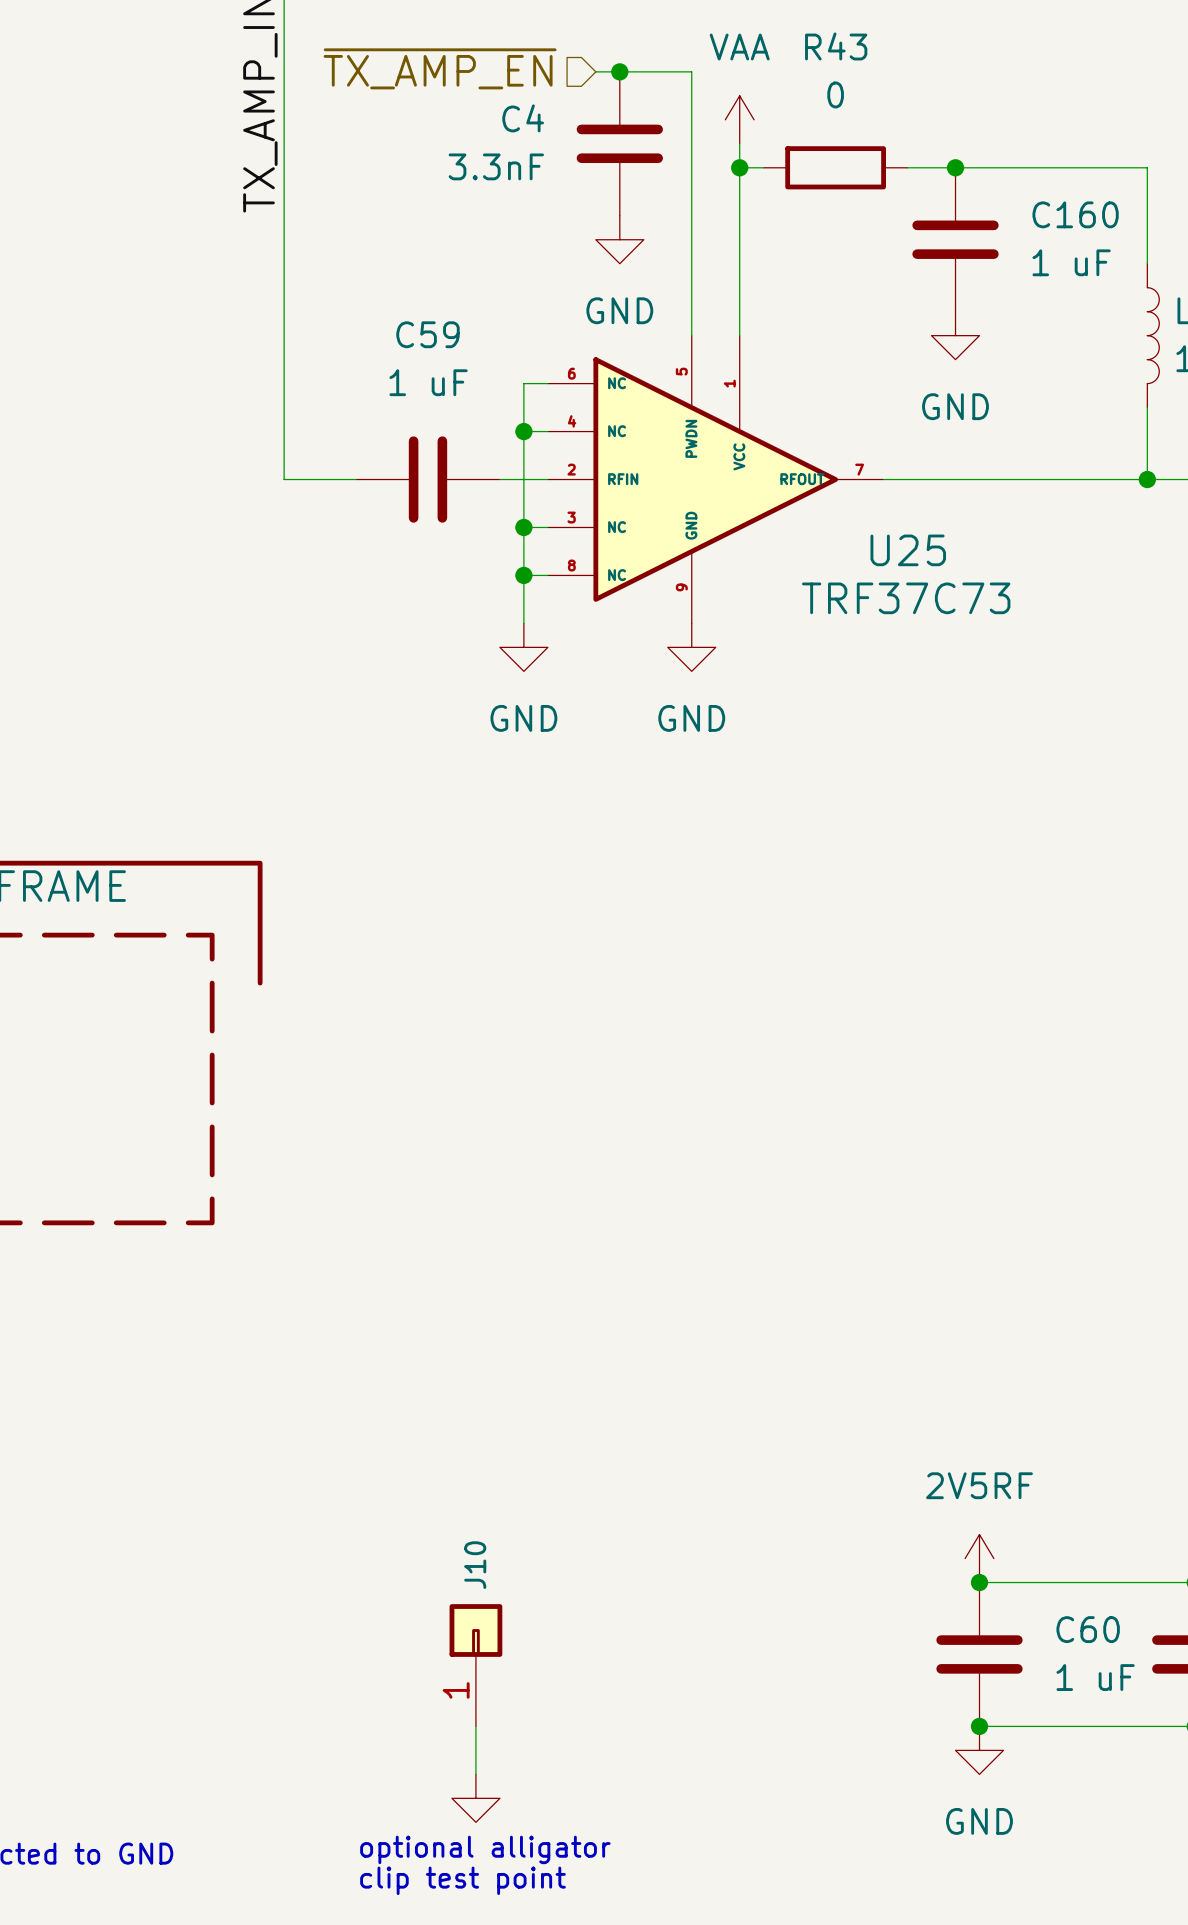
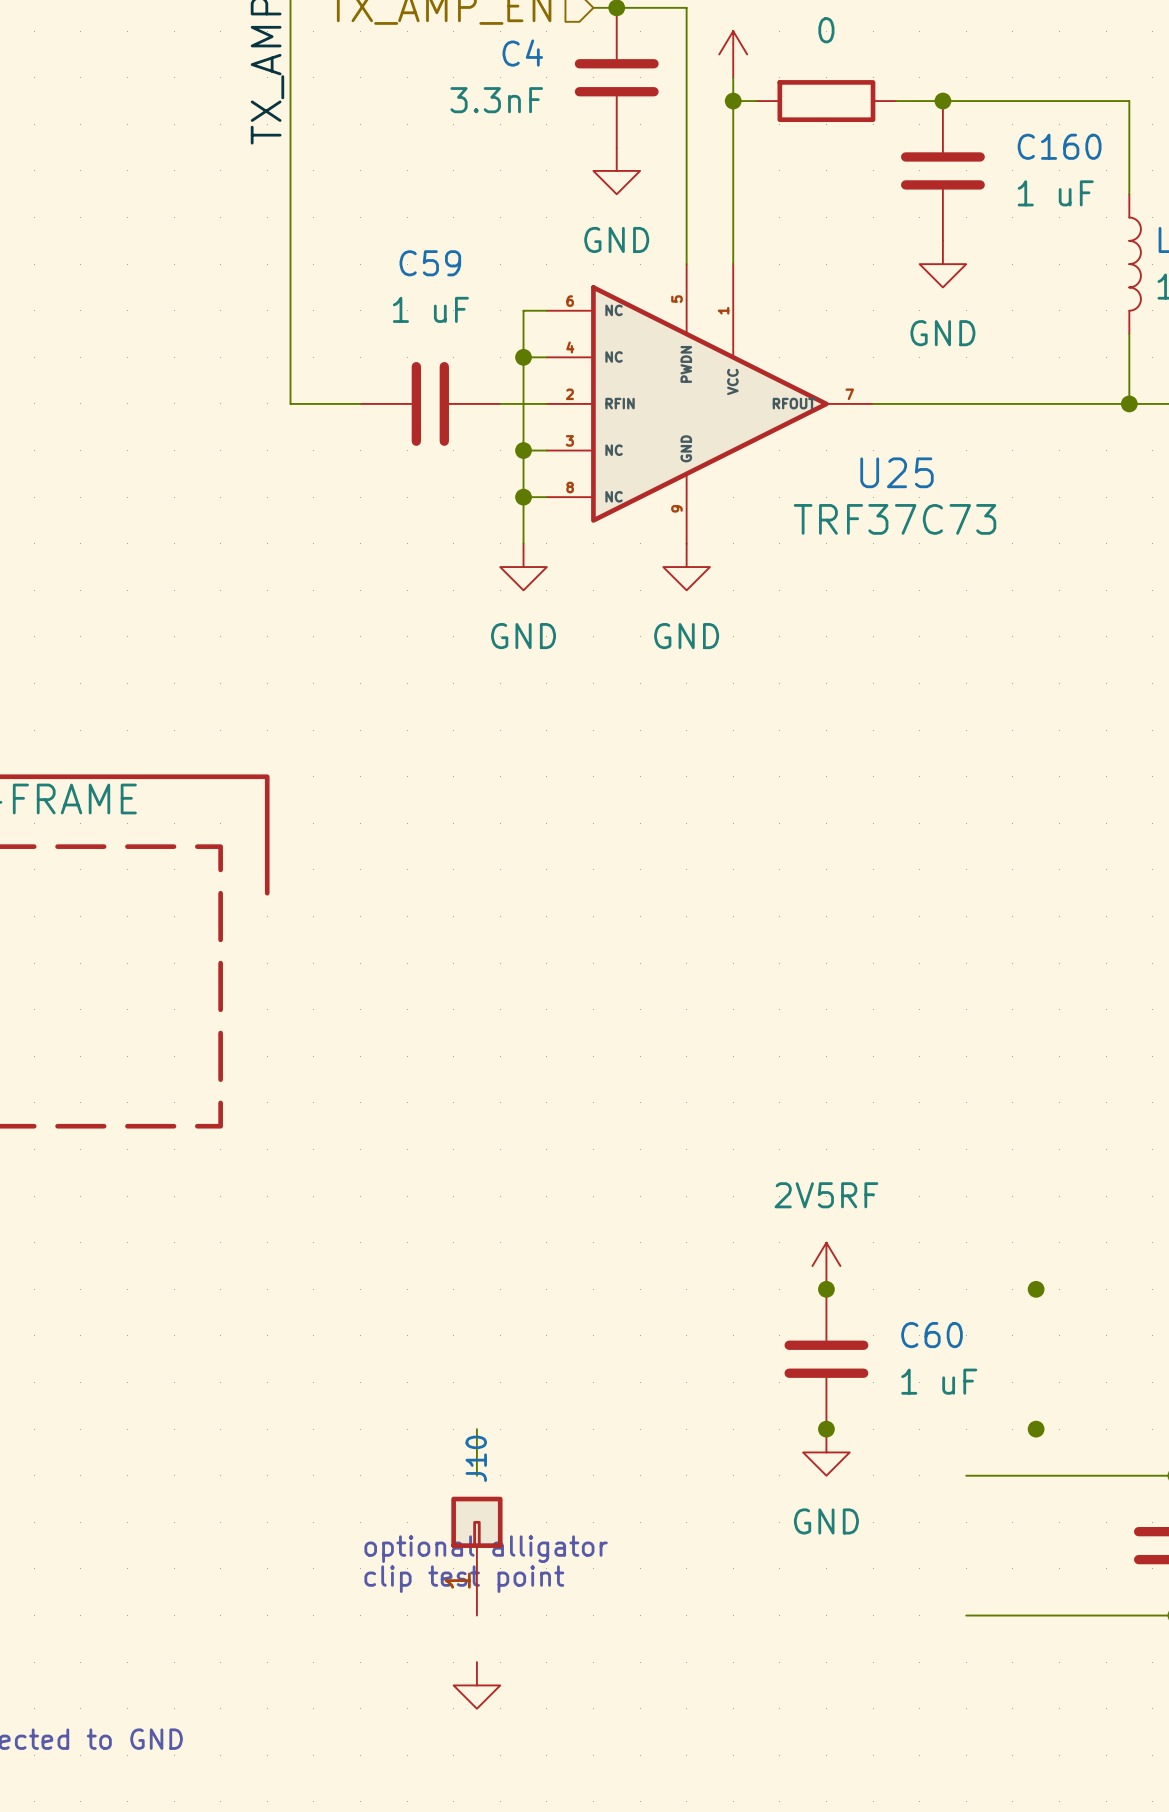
junction: none -> (826, 1289)
junction: none -> (1036, 1289)
junction: none -> (826, 1429)
junction: none -> (1036, 1429)
power symbol position: 2V5RF (979, 1558) -> 2V5RF (826, 1266)
junction: (979, 1582) -> none
C60 position: (979, 1654) -> (826, 1359)
wire: (475, 1726) (475, 1774) -> (476, 1429) (476, 1475)
junction: (979, 1726) -> none
power symbol position: GND (979, 1750) -> GND (826, 1452)
text position: optional alligator (485, 1849) -> optional alligator (486, 1549)
text position: clip test point (462, 1880) -> clip test point (464, 1579)

